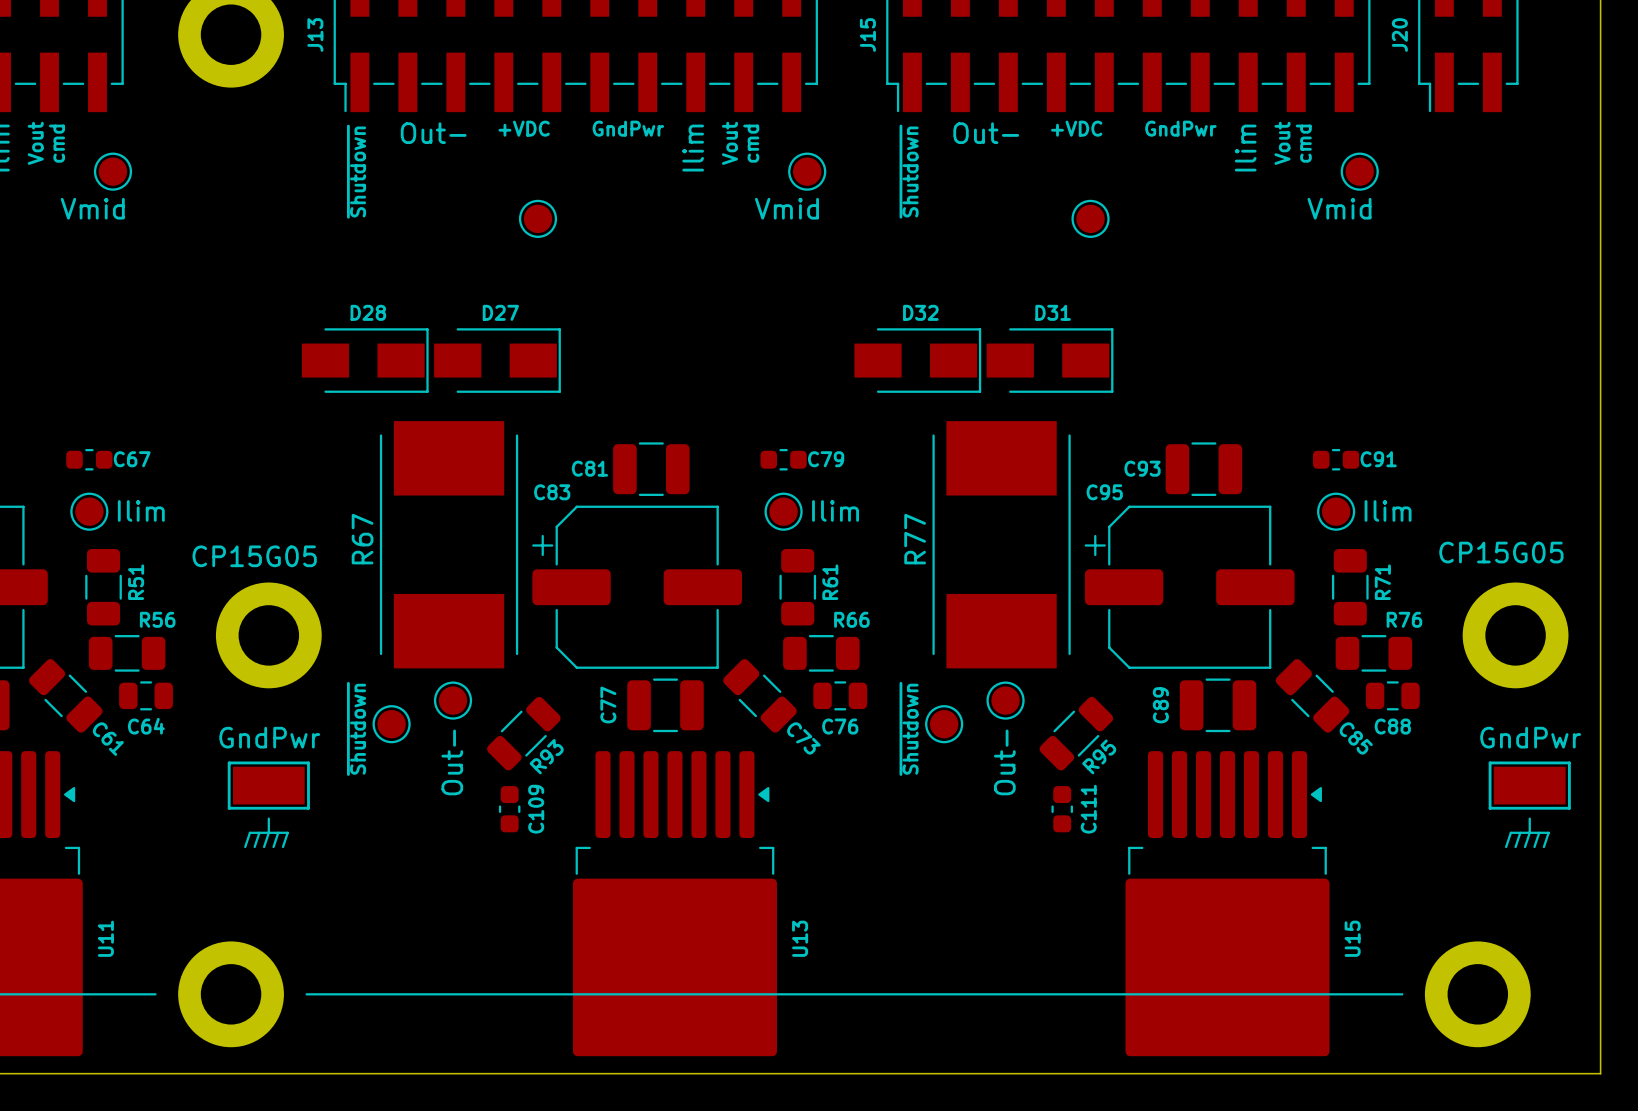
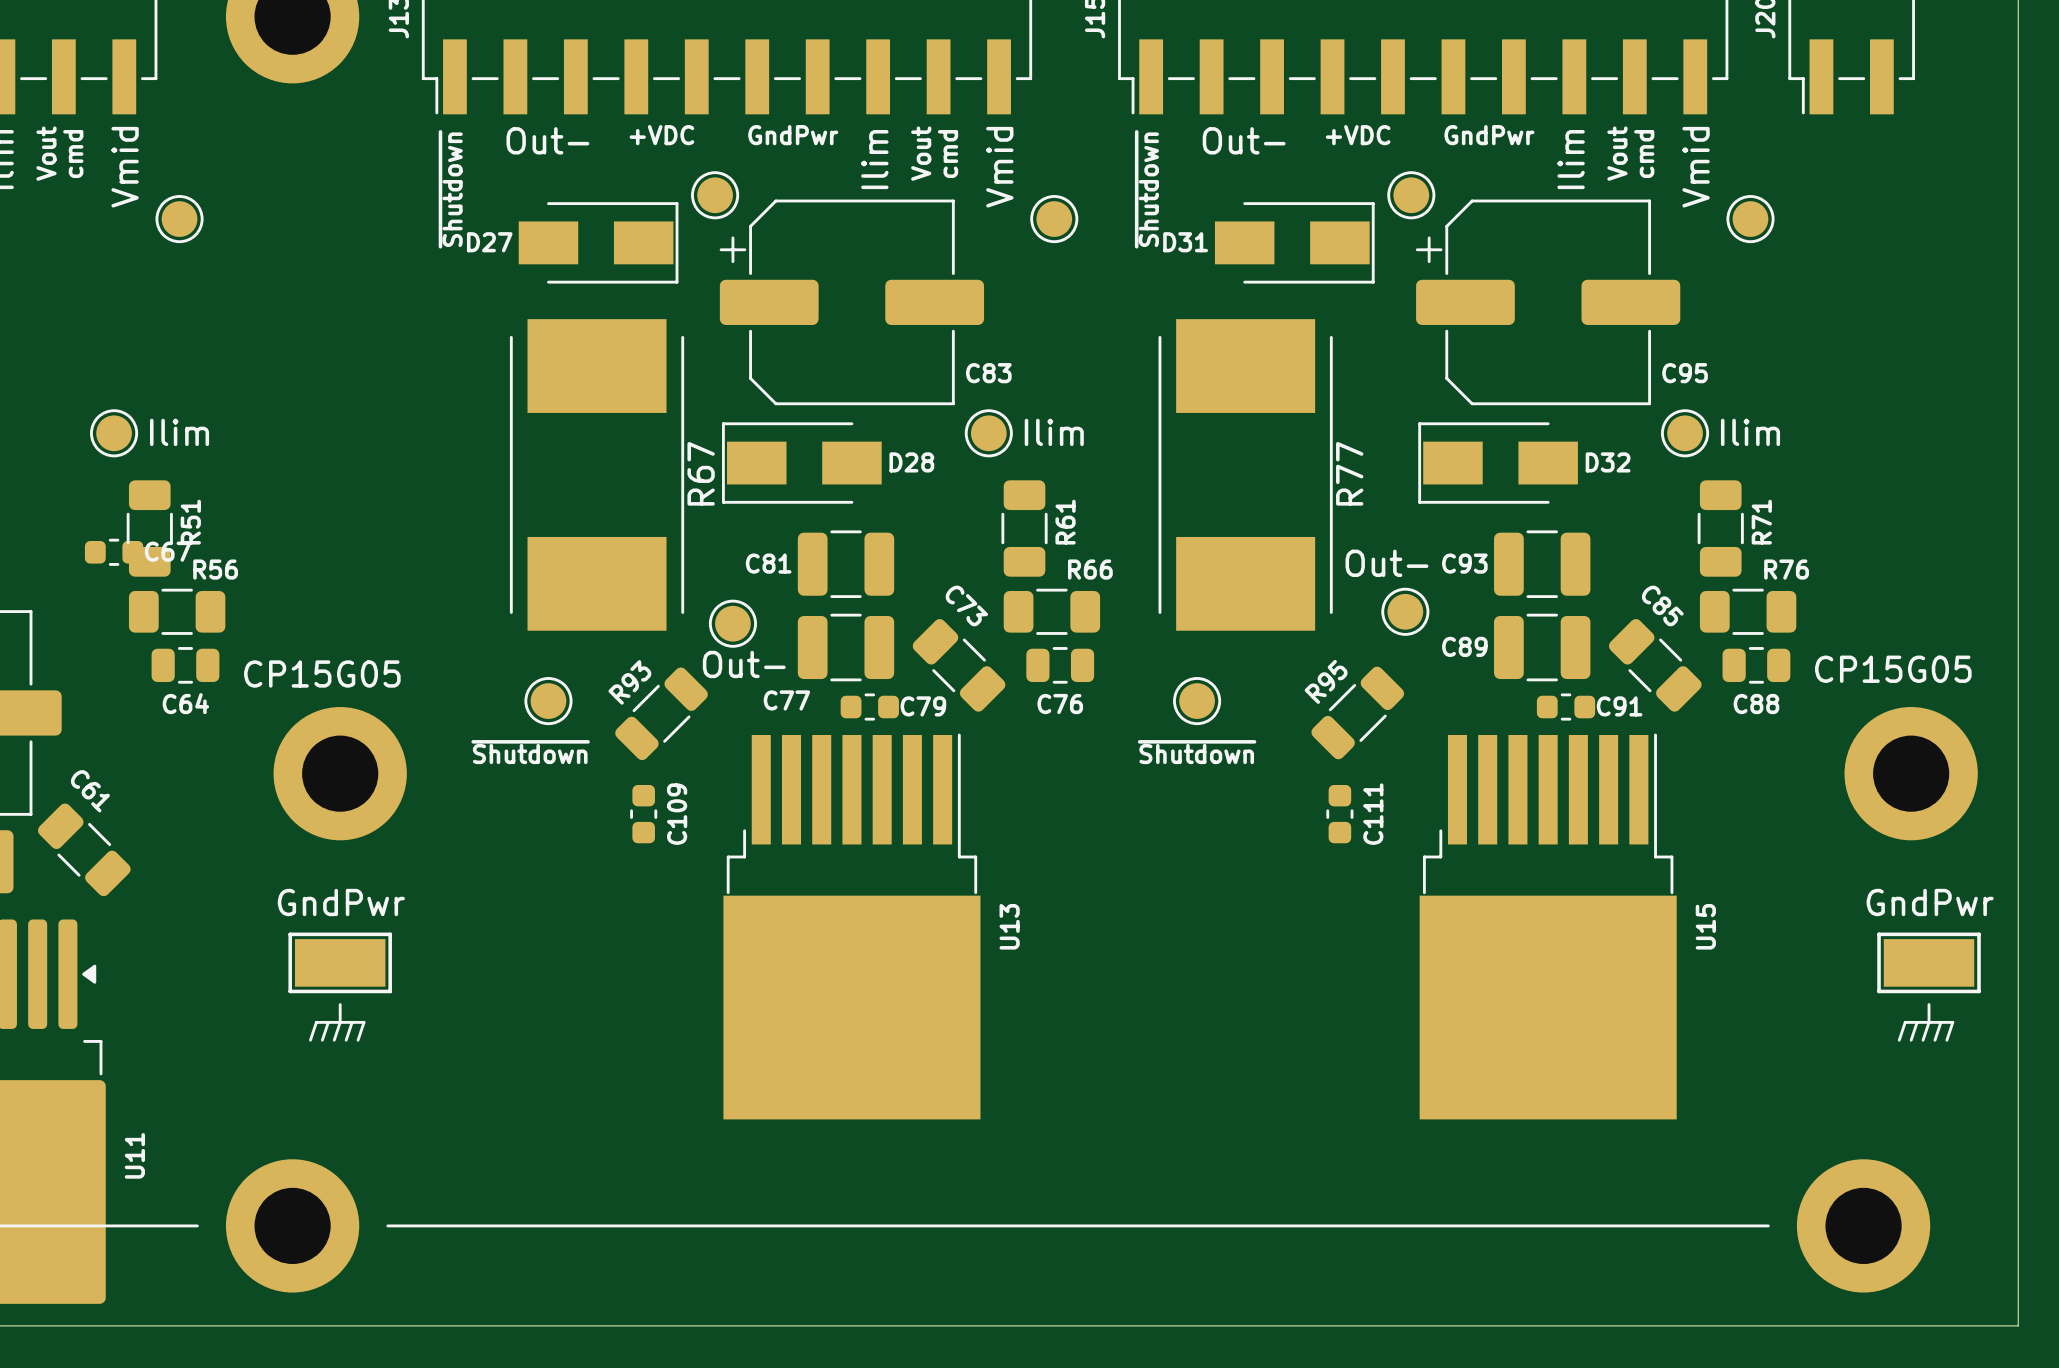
part position: (112, 171) -> (179, 219)
part position: (807, 171) -> (1054, 219)
part position: (1359, 171) -> (1750, 219)
text rotation: 0° (92, 208) -> 90° counterclockwise (125, 167)
text rotation: 0° (786, 208) -> 90° counterclockwise (999, 167)
text rotation: 0° (1339, 208) -> 90° counterclockwise (1696, 167)
part position: (538, 218) -> (715, 195)
part position: (1090, 218) -> (1411, 195)
D28 name position: D28 (368, 312) -> D28 (911, 462)
D27 name position: D27 (500, 312) -> D27 (489, 242)
D32 name position: D32 (920, 312) -> D32 (1608, 462)
D31 name position: D31 (1053, 312) -> D31 (1185, 242)
D28 rotation: 0° (365, 360) -> 180° (801, 463)
D28 position: (365, 360) -> (801, 463)
D27 position: (497, 360) -> (598, 242)
D32 rotation: 0° (917, 360) -> 180° (1498, 463)
D32 position: (917, 360) -> (1498, 463)
D31 position: (1050, 360) -> (1294, 242)
part: none -> (114, 433)
part: none -> (988, 433)
part: none -> (1685, 433)
C79 position: (783, 459) -> (869, 707)
C91 position: (1336, 459) -> (1566, 707)
text: none -> Out- (1386, 563)
C81 position: (651, 469) -> (846, 564)
C93 position: (1203, 469) -> (1542, 564)
C83 name position: C83 (552, 492) -> C83 (988, 373)
C95 name position: C95 (1104, 492) -> C95 (1685, 373)
part: none -> (1405, 611)
text position: Ilim (141, 510) -> Ilim (179, 432)
text position: Ilim (835, 510) -> Ilim (1054, 432)
text position: Ilim (1388, 510) -> Ilim (1750, 432)
part: (89, 511) -> none
part: (783, 511) -> none
part: (1336, 511) -> none
part: none -> (732, 623)
R67 name position: R67 (362, 539) -> R67 (701, 473)
R77 name position: R77 (915, 539) -> R77 (1349, 473)
R67 position: (449, 544) -> (597, 474)
R77 position: (1001, 544) -> (1245, 474)
text: none -> Out- (744, 664)
part: none -> (548, 701)
part: none -> (1197, 701)
R51 position: (103, 587) -> (149, 528)
C83 position: (637, 587) -> (851, 302)
R61 position: (797, 587) -> (1024, 528)
C95 position: (1189, 587) -> (1548, 302)
R71 position: (1350, 587) -> (1720, 528)
R56 position: (127, 653) -> (177, 611)
R66 position: (821, 653) -> (1051, 611)
R76 position: (1373, 653) -> (1748, 611)
C64 position: (146, 695) -> (185, 665)
C73 position: (759, 695) -> (959, 665)
C76 position: (840, 695) -> (1060, 665)
C85 position: (1312, 695) -> (1655, 665)
C88 position: (1392, 695) -> (1756, 665)
part: (453, 700) -> none
part: (1005, 700) -> none
C77 name rotation: 0° (608, 704) -> 90° clockwise (786, 700)
C77 position: (665, 705) -> (846, 647)
C89 name rotation: 0° (1160, 705) -> 90° clockwise (1464, 646)
C89 position: (1218, 705) -> (1542, 647)
part: (391, 724) -> none
part: (944, 724) -> none
text rotation: 0° (356, 728) -> 90° clockwise (530, 752)
text rotation: 0° (909, 728) -> 90° clockwise (1197, 752)
R93 position: (523, 733) -> (661, 713)
R95 position: (1076, 733) -> (1357, 712)
C73 name position: C73 (803, 738) -> C73 (966, 605)
C85 name position: C85 (1356, 738) -> C85 (1662, 605)
C61 name position: C61 (108, 739) -> C61 (90, 791)
U13 footprint: [572, 751, 777, 1057] -> [723, 733, 981, 1120]
U15 footprint: [1125, 751, 1330, 1057] -> [1419, 733, 1677, 1120]
R93 name position: R93 (546, 756) -> R93 (629, 682)
R95 name position: R95 (1099, 756) -> R95 (1326, 681)
text: Out- (452, 762) -> none
text: Out- (1004, 762) -> none
C109 position: (509, 809) -> (643, 814)
C111 position: (1062, 809) -> (1339, 814)

